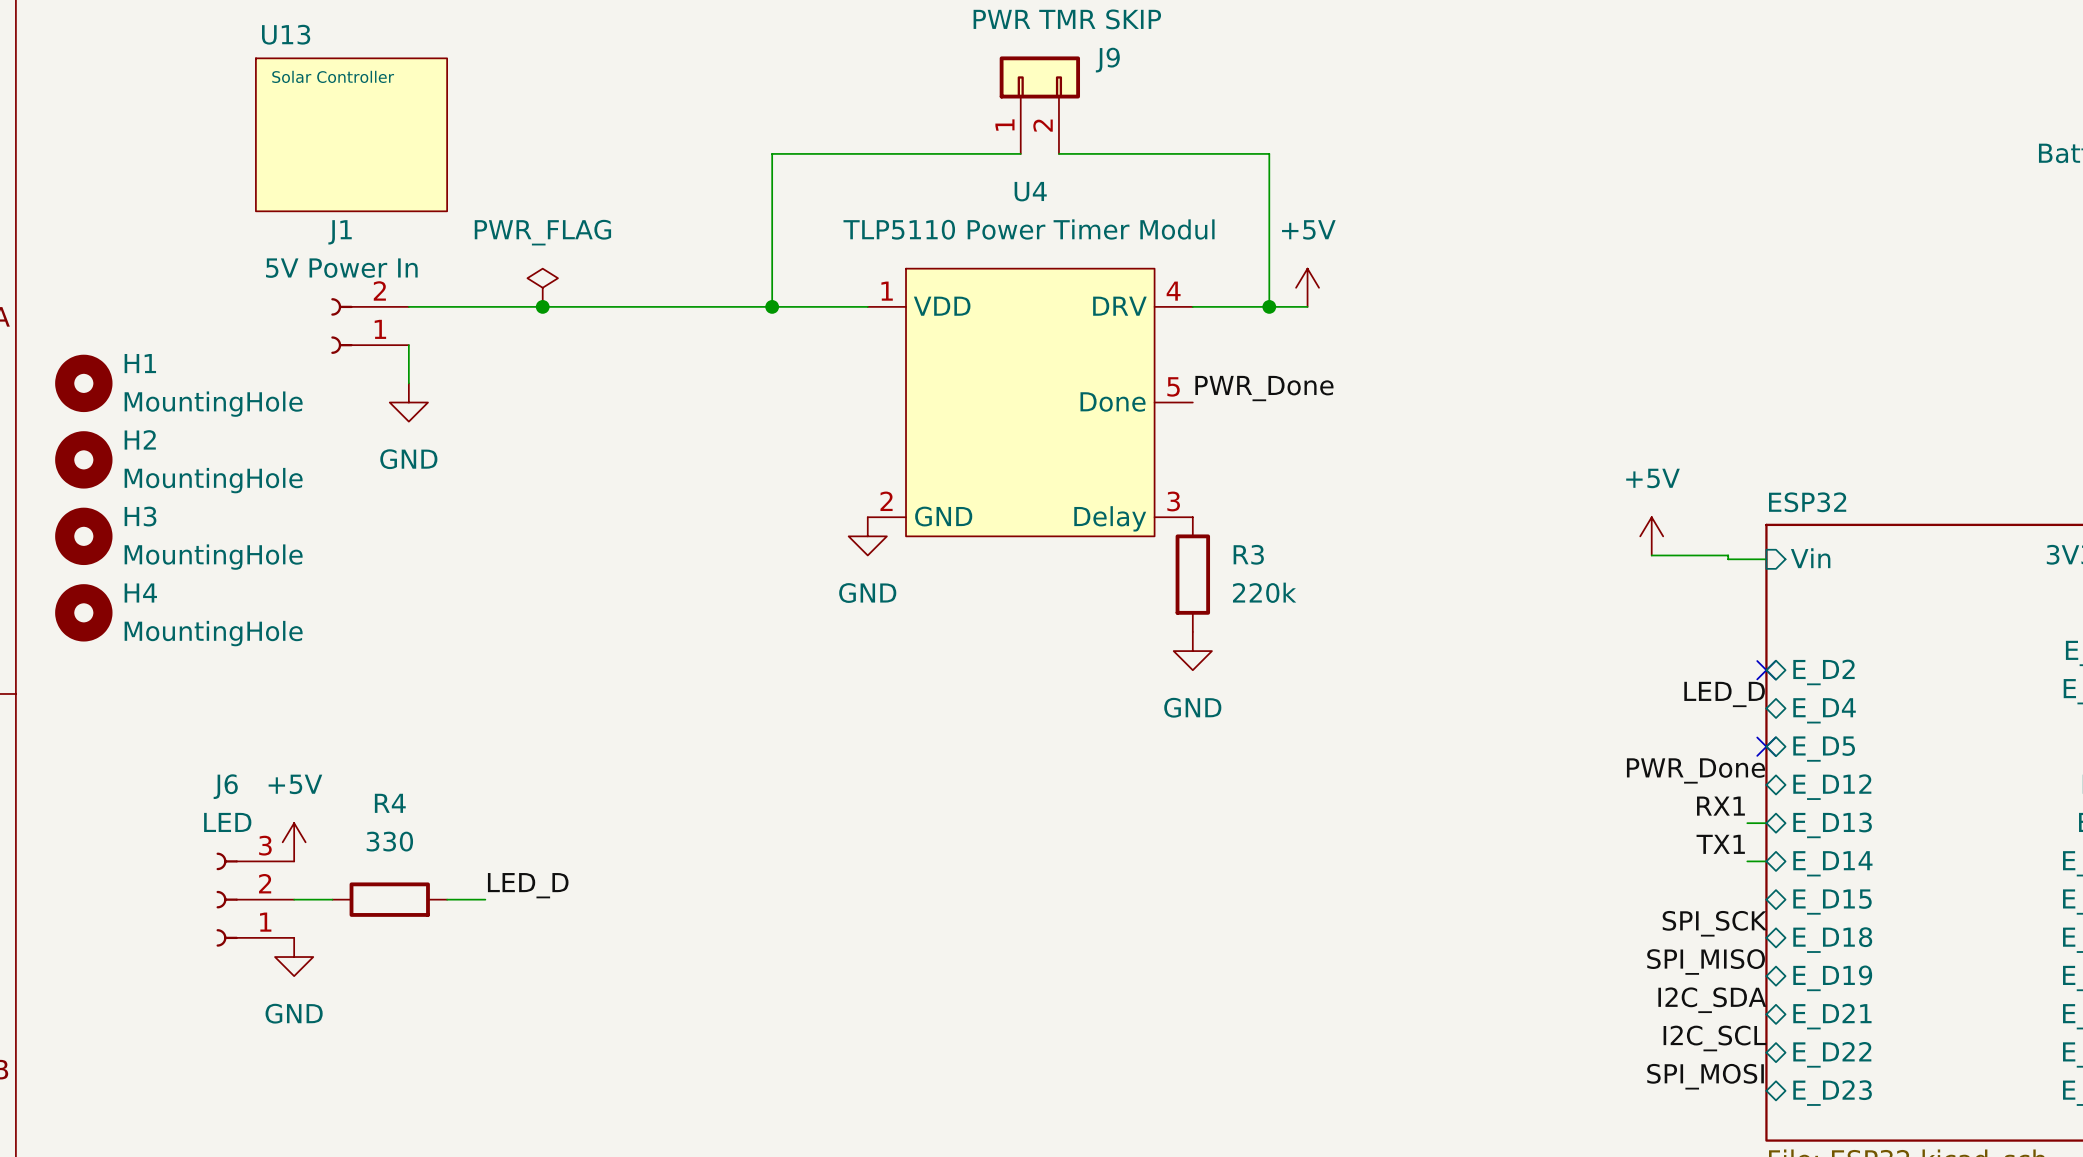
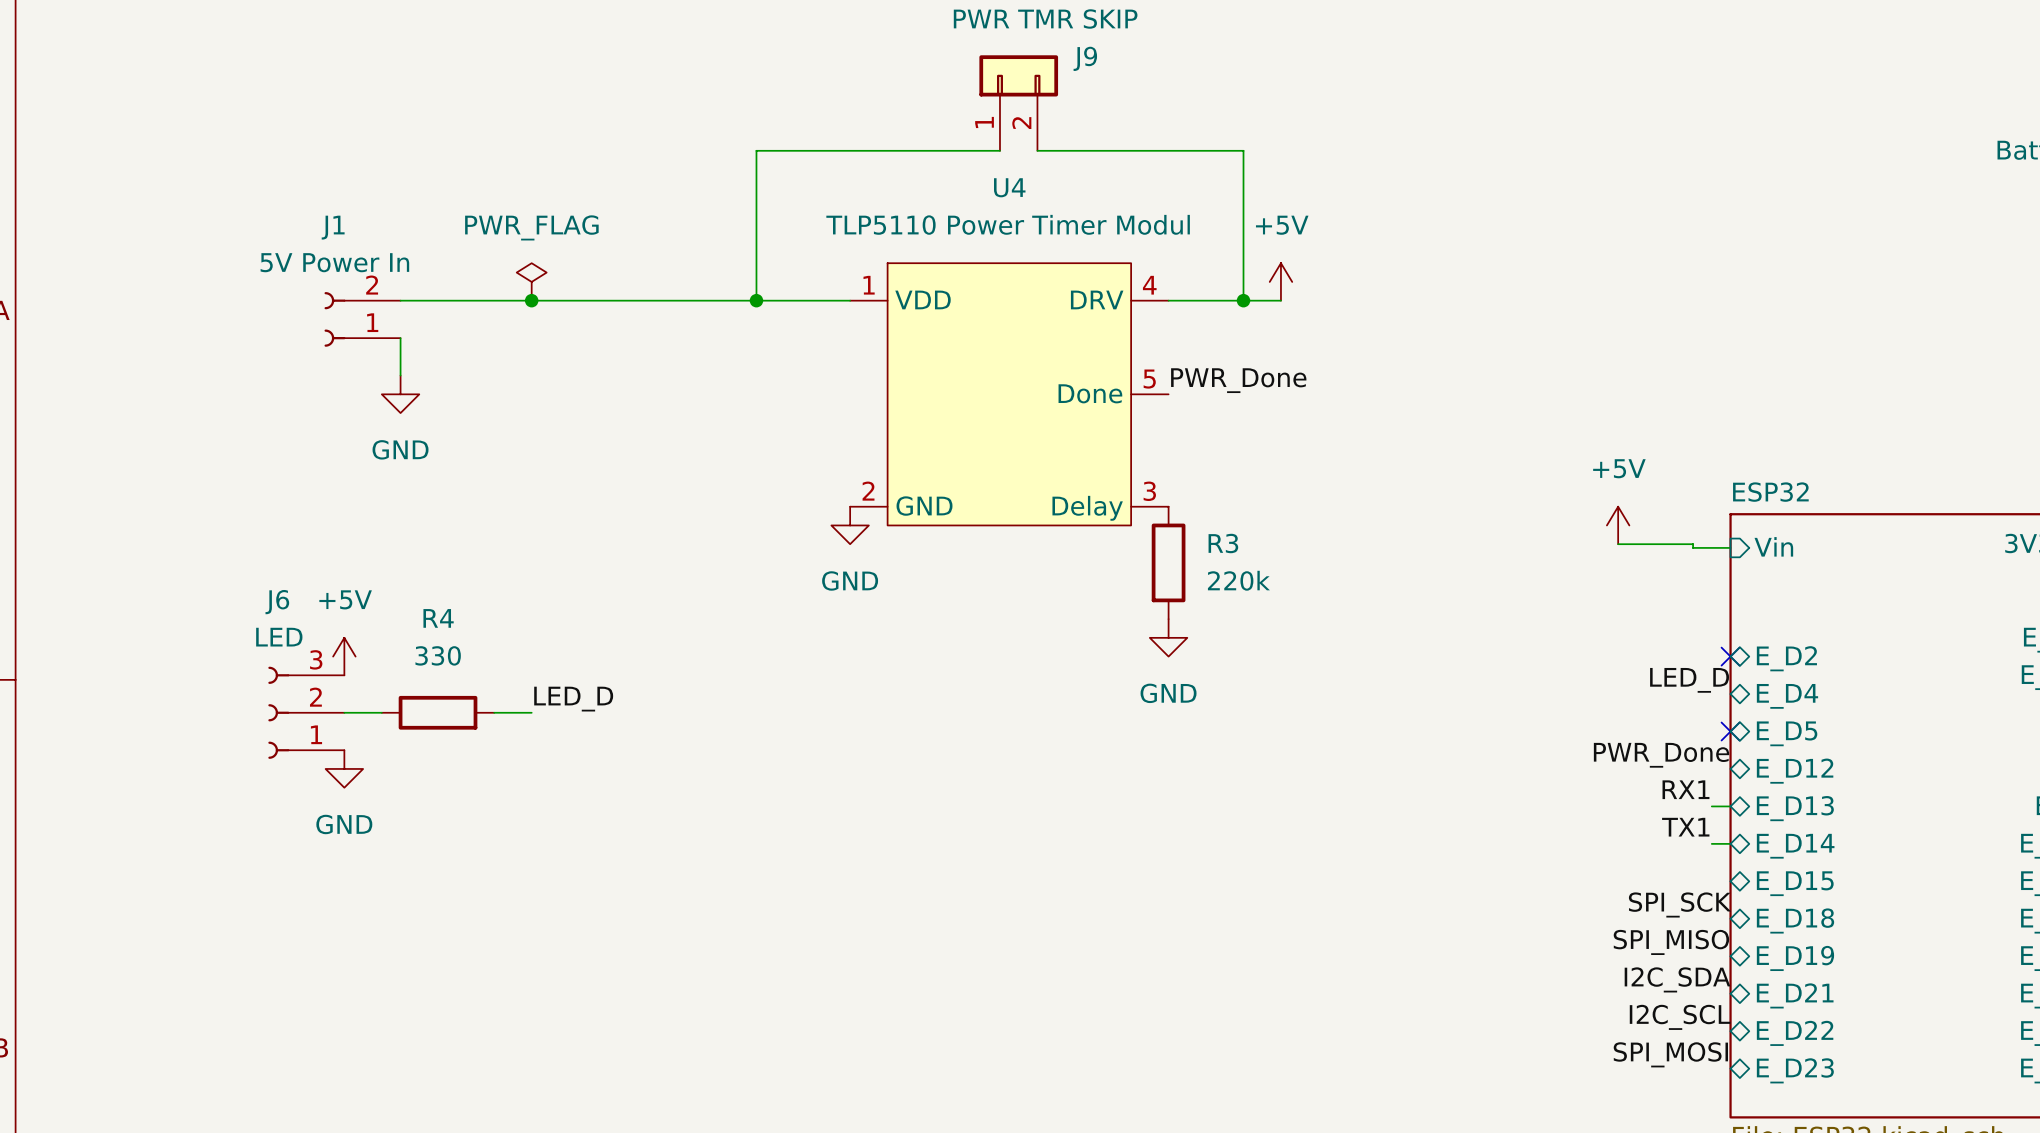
U13: Solar Controller (351, 134) -> none
H1: MountingHole (83, 383) -> none
H2: MountingHole (83, 459) -> none
H3: MountingHole (83, 536) -> none
H4: MountingHole (83, 612) -> none
power symbol position: +5V (294, 842) -> +5V (344, 656)
label position: LED_D (528, 885) -> LED_D (573, 699)
J6 position: (255, 899) -> (306, 712)
wire: (294, 899) (332, 899) -> (344, 712) (381, 712)
R4 position: (389, 899) -> (438, 712)
wire: (447, 899) (485, 899) -> (494, 712) (531, 712)
power symbol position: GND (294, 957) -> GND (344, 768)

